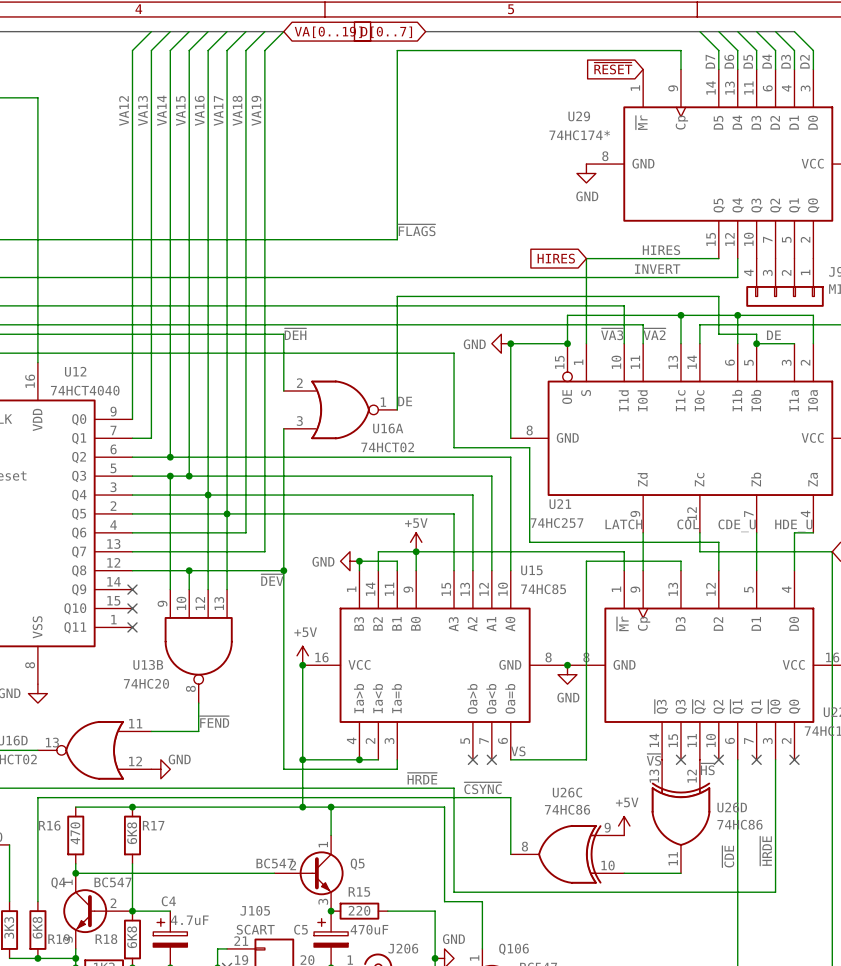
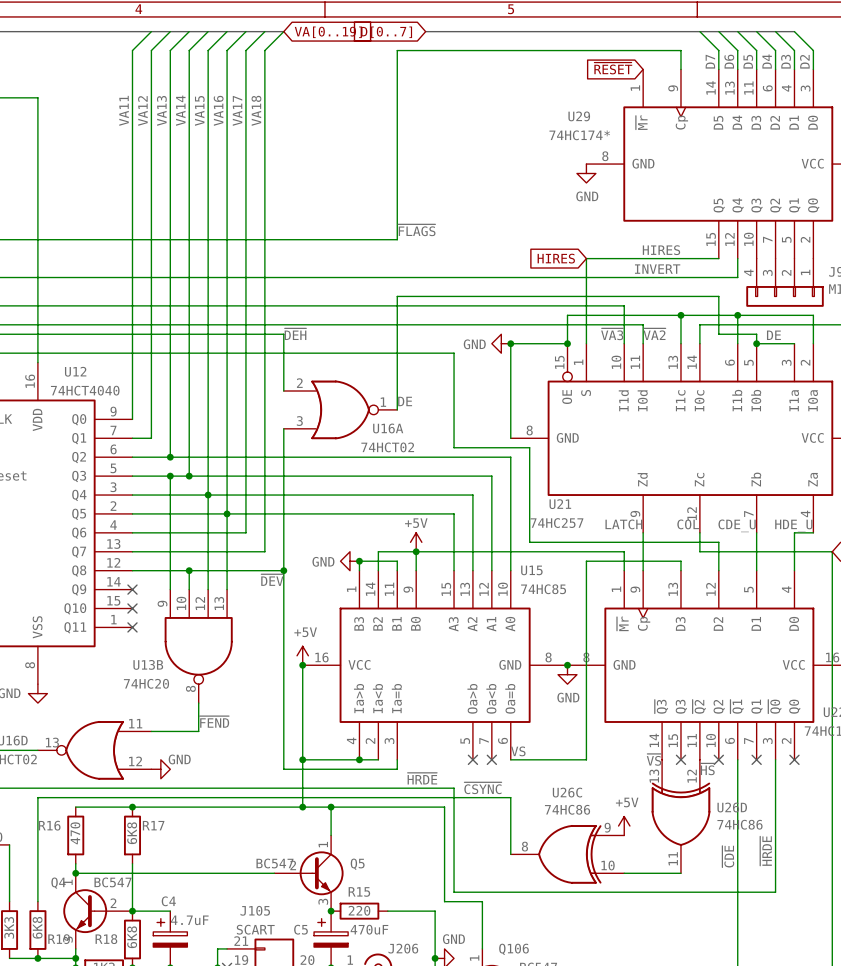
label: VA12 (123, 110) -> VA11 (124, 110)
label: VA13 (142, 110) -> VA12 (142, 110)
label: VA14 (161, 110) -> VA13 (161, 110)
label: VA15 (180, 110) -> VA14 (180, 110)
label: VA16 (199, 110) -> VA15 (199, 110)
label: VA17 (218, 110) -> VA16 (218, 110)
label: VA18 (237, 110) -> VA17 (237, 110)
label: VA19 (256, 110) -> VA18 (256, 110)

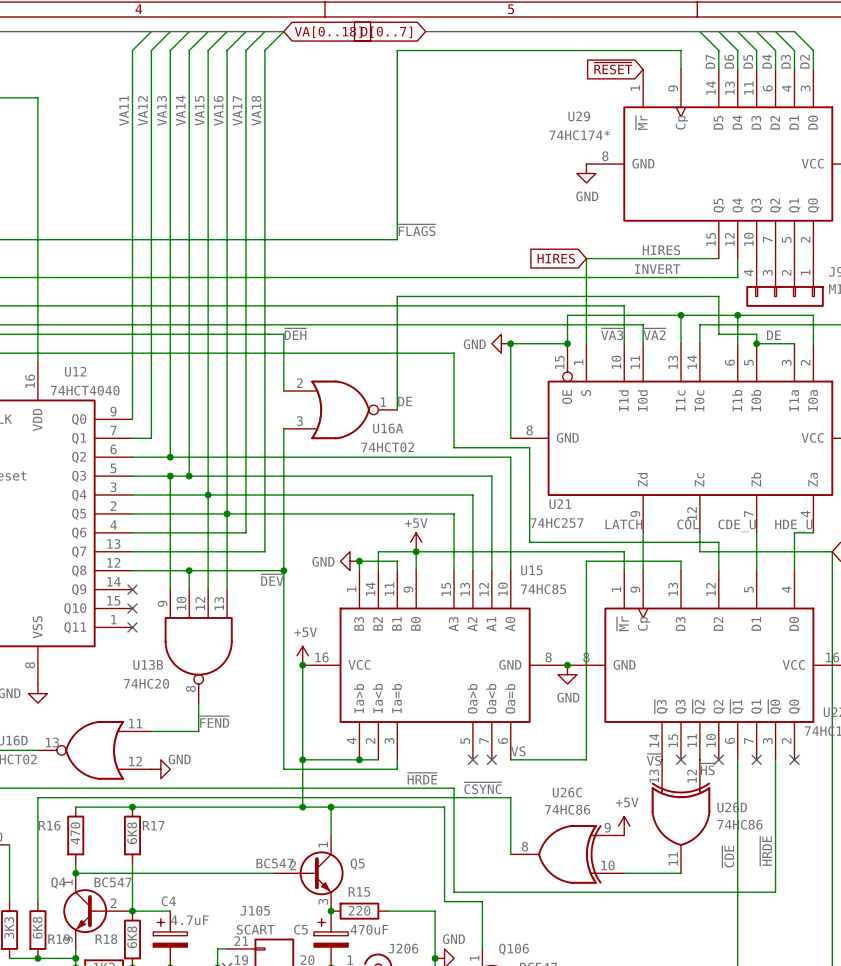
global label: VA[0..19] (328, 32) -> VA[0..18] (328, 32)

